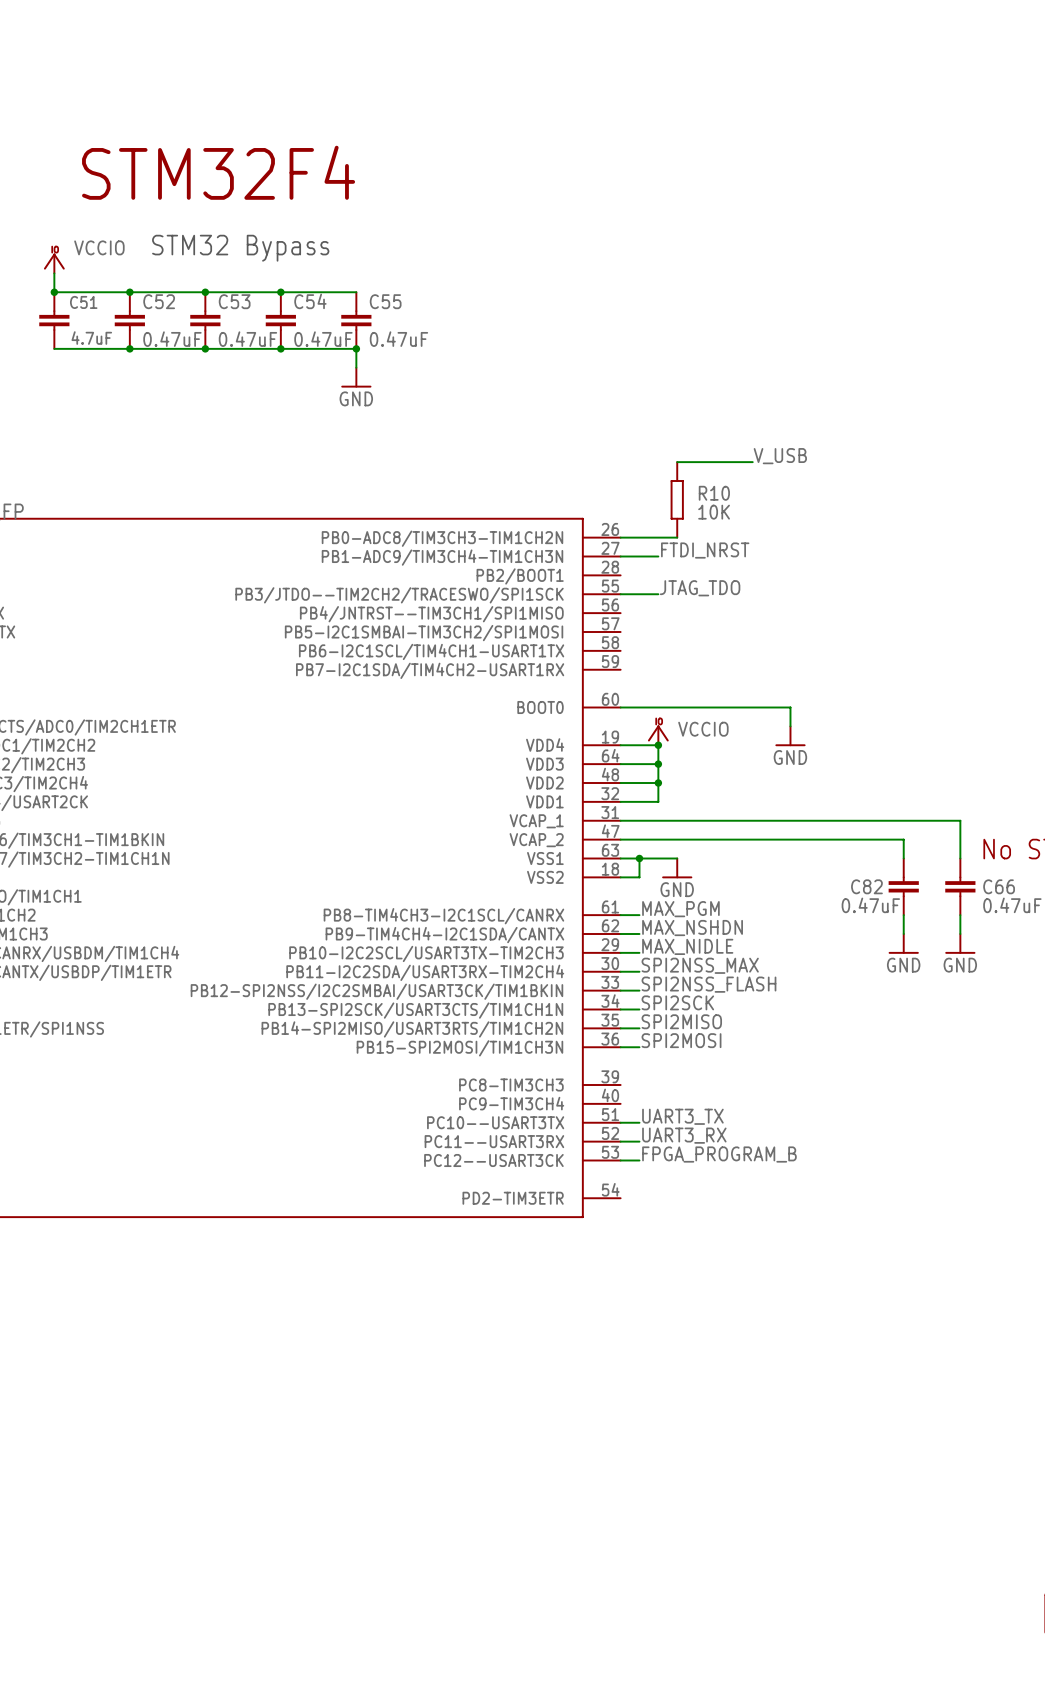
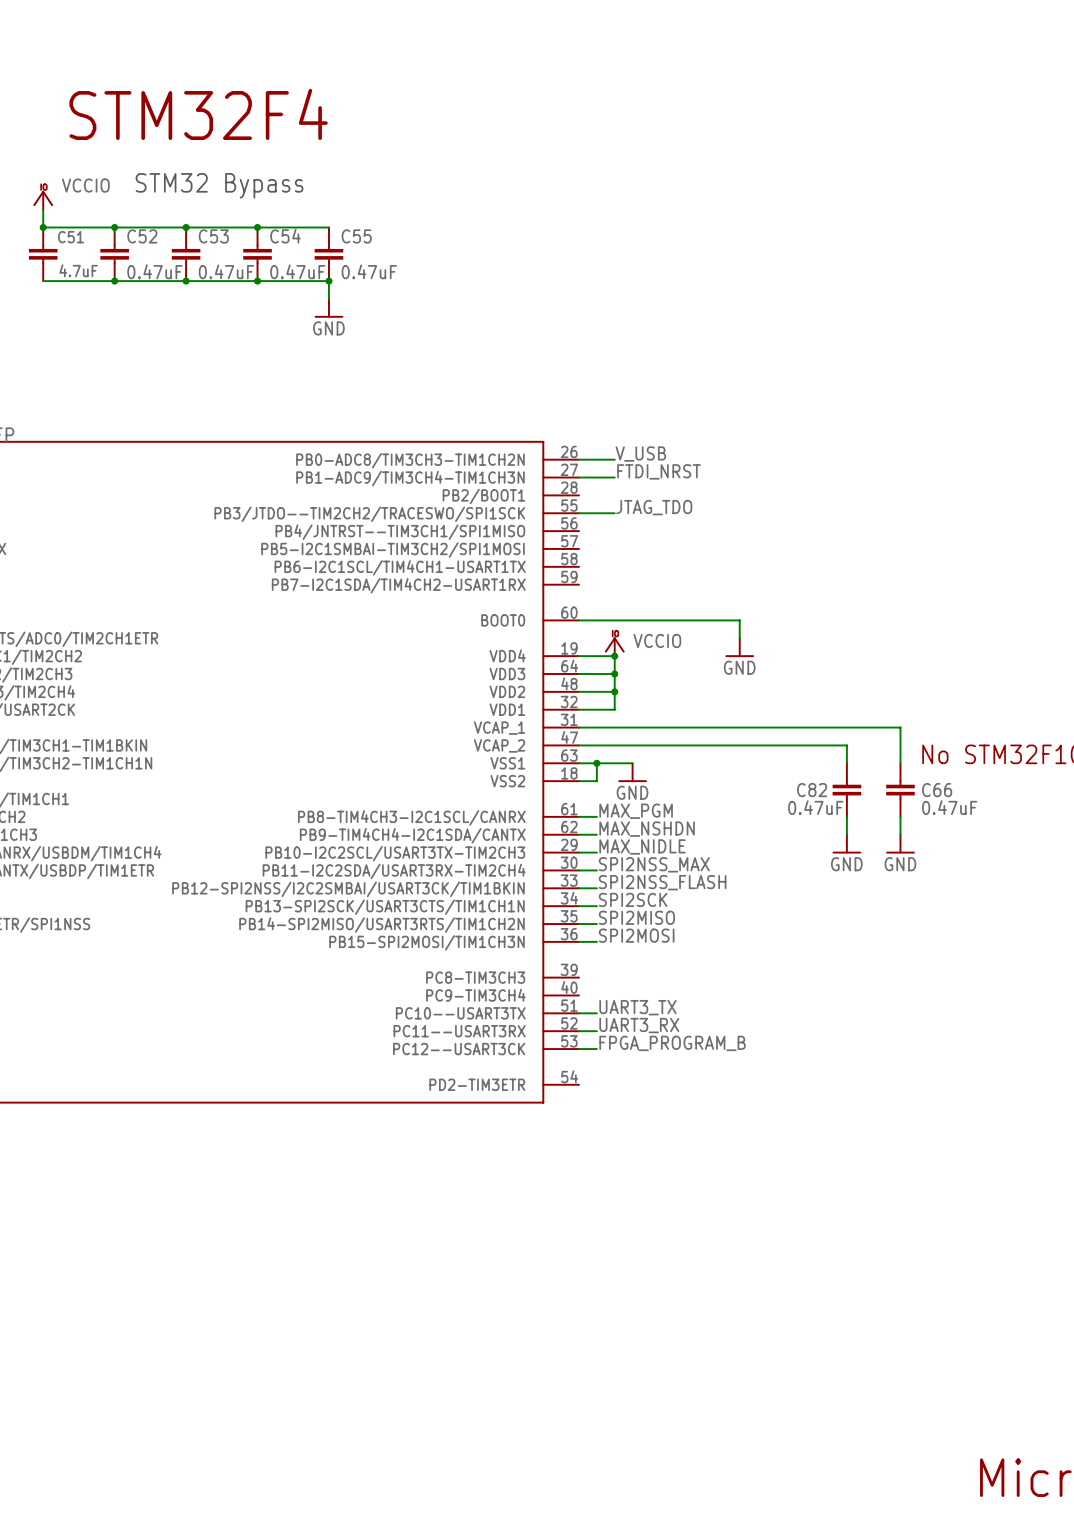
label position: V_USB (780, 456) -> V_USB (640, 454)
wire: (677, 462) (752, 462) -> none
R10: 10K (677, 499) -> none
wire: (658, 537) (677, 537) -> none

